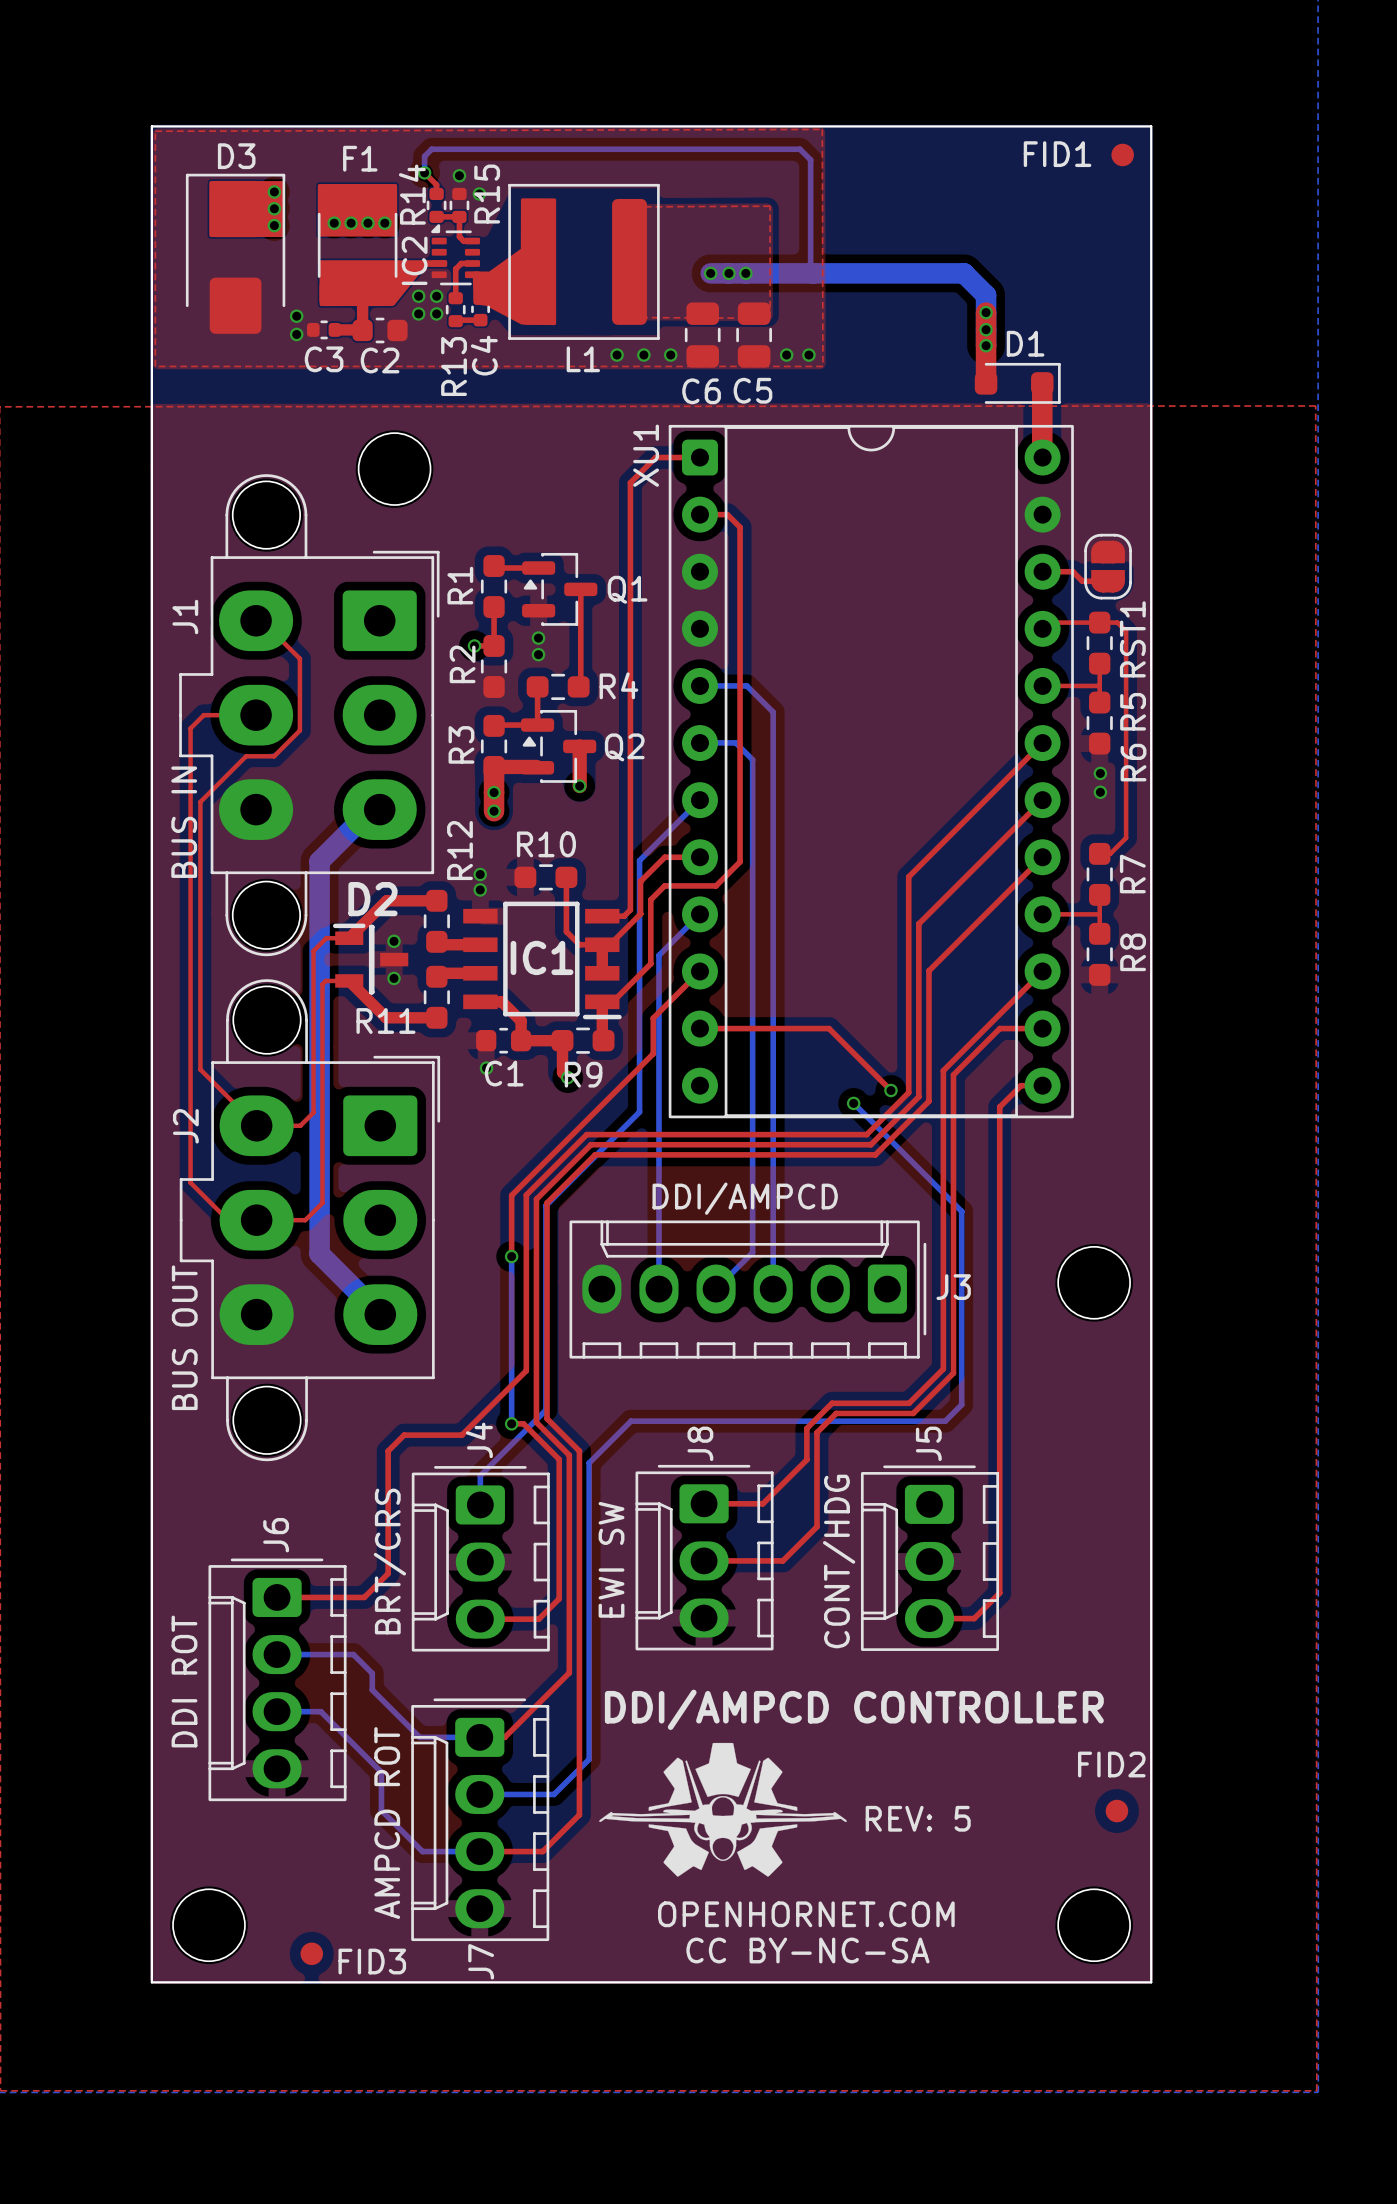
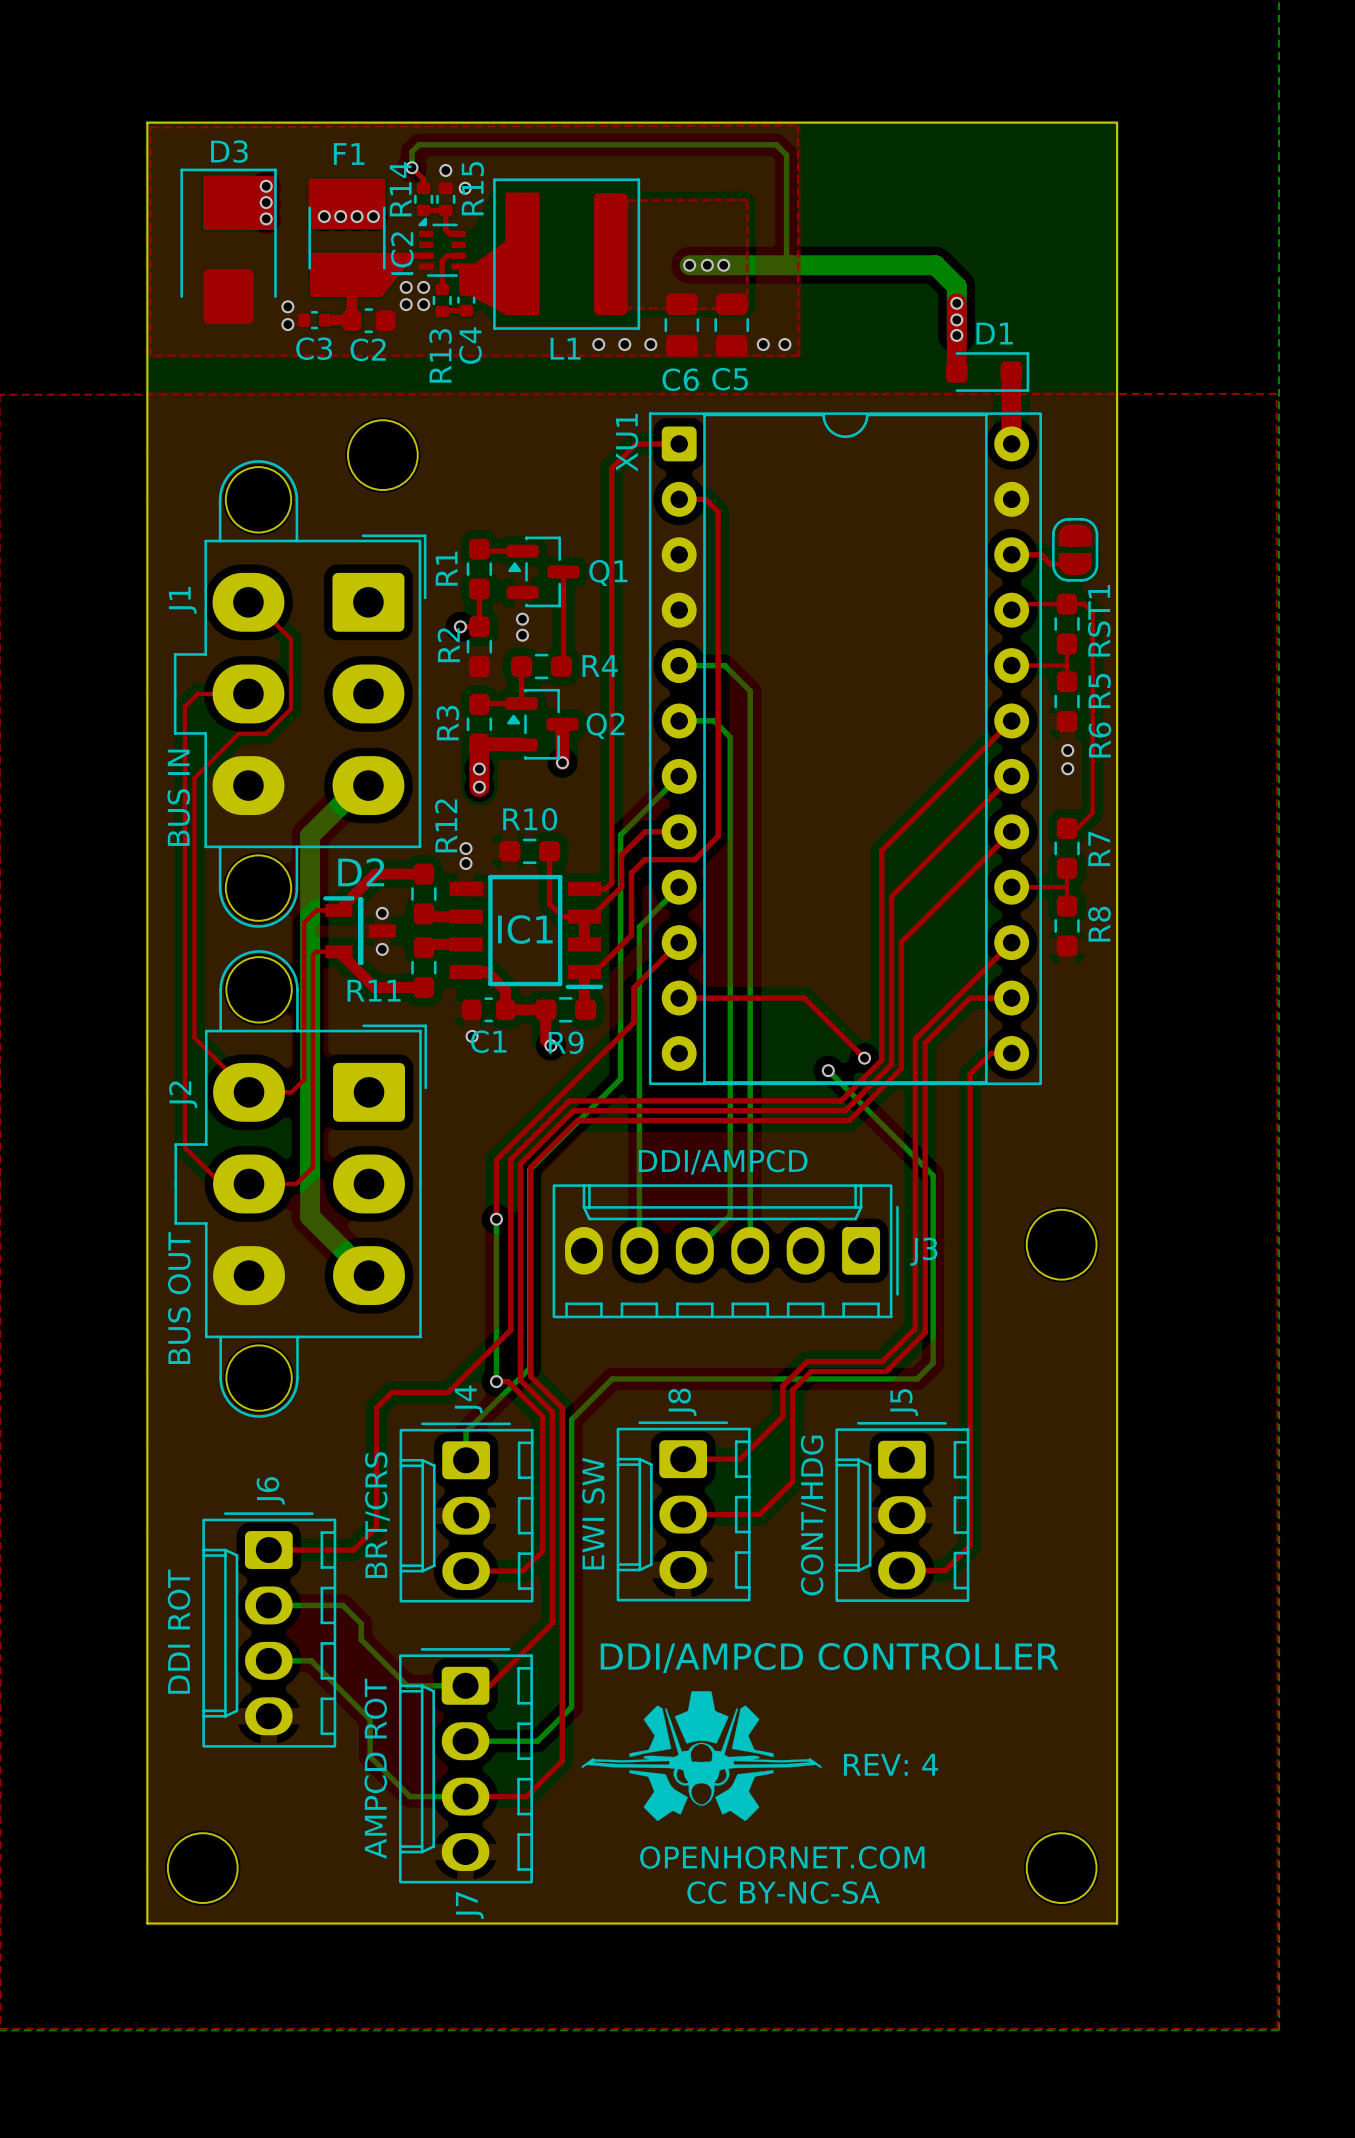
FID1: (1122, 154) -> none
FID2: (1116, 1811) -> none
text: REV: 5 (918, 1818) -> REV: 4 (891, 1764)
FID3: (311, 1953) -> none

